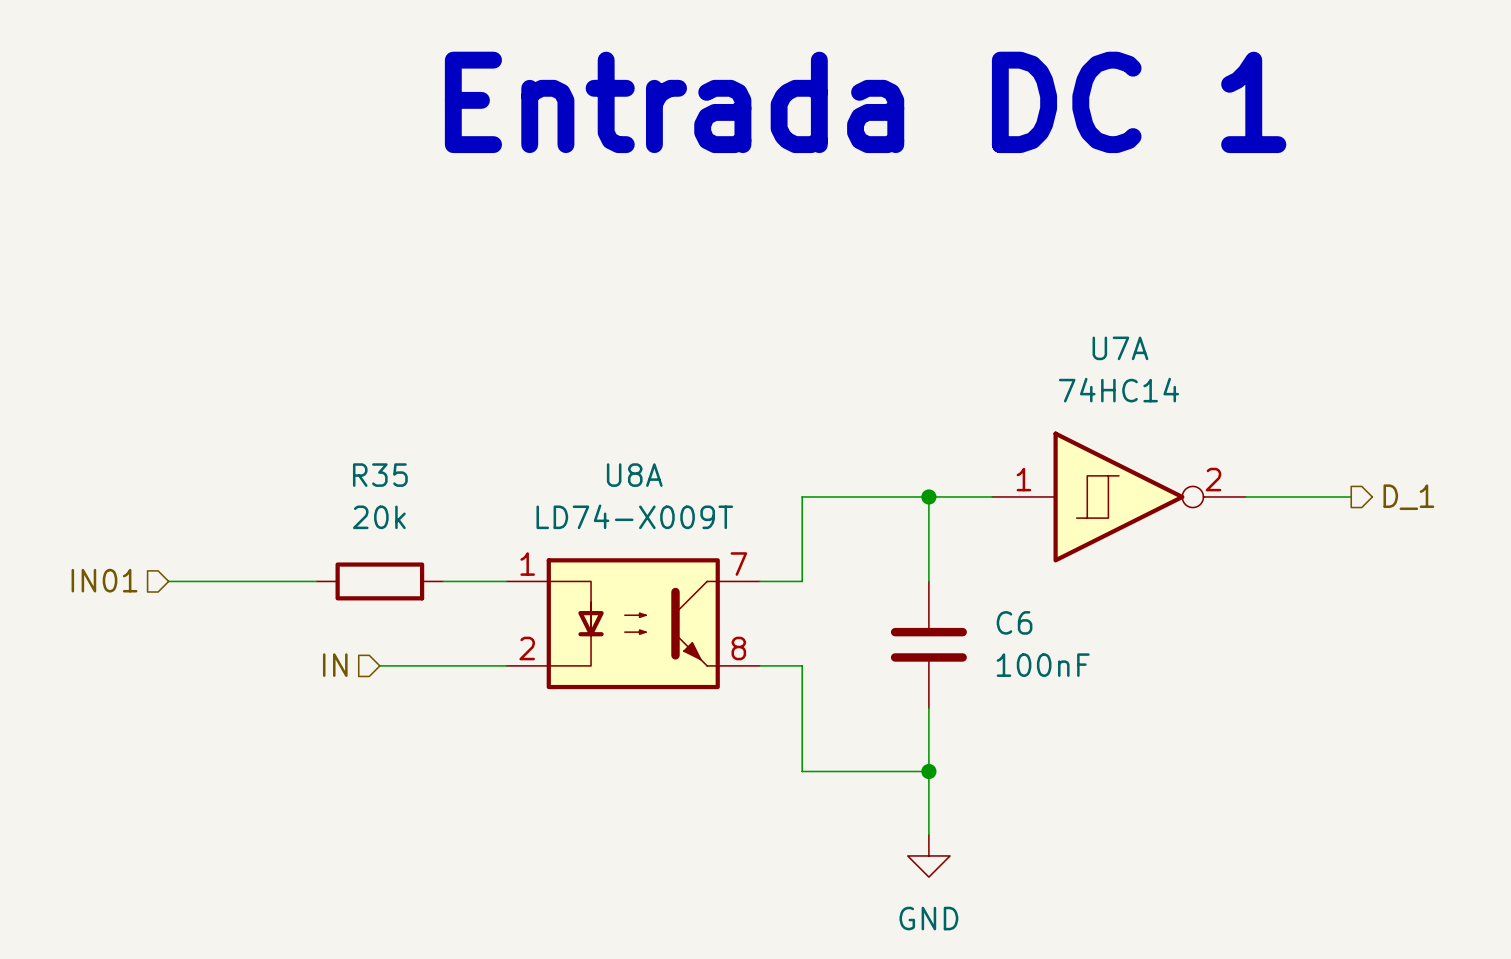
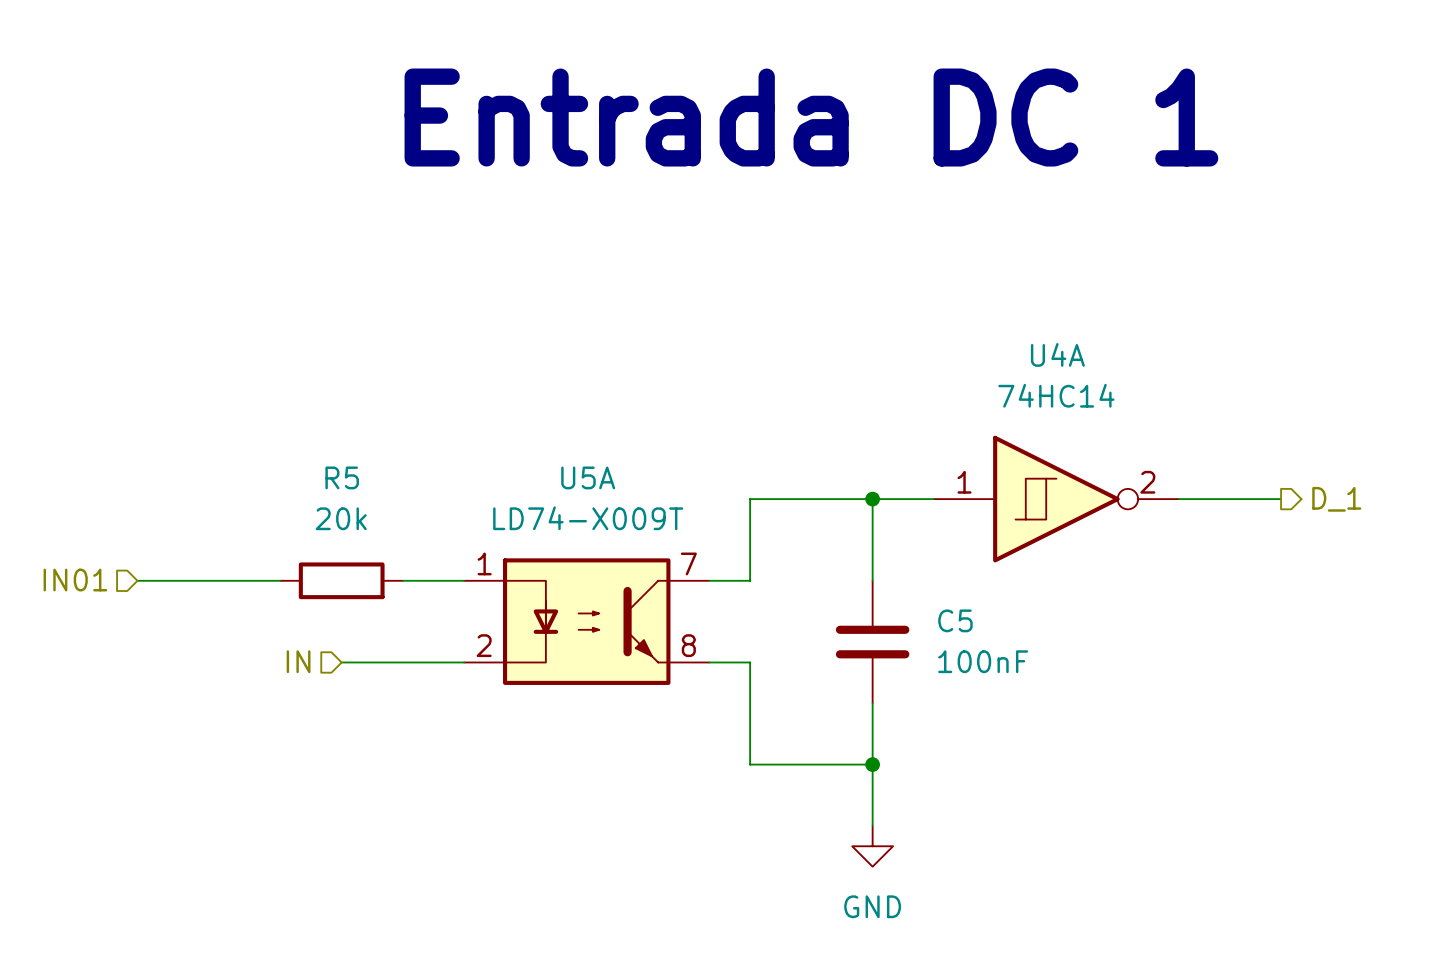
U7A name: U7A (1120, 348) -> U4A (1057, 354)
R35 name: R35 (380, 475) -> R5 (342, 477)
U8A name: U8A (634, 475) -> U5A (588, 477)
C6 name: C6 (1014, 622) -> C5 (955, 620)

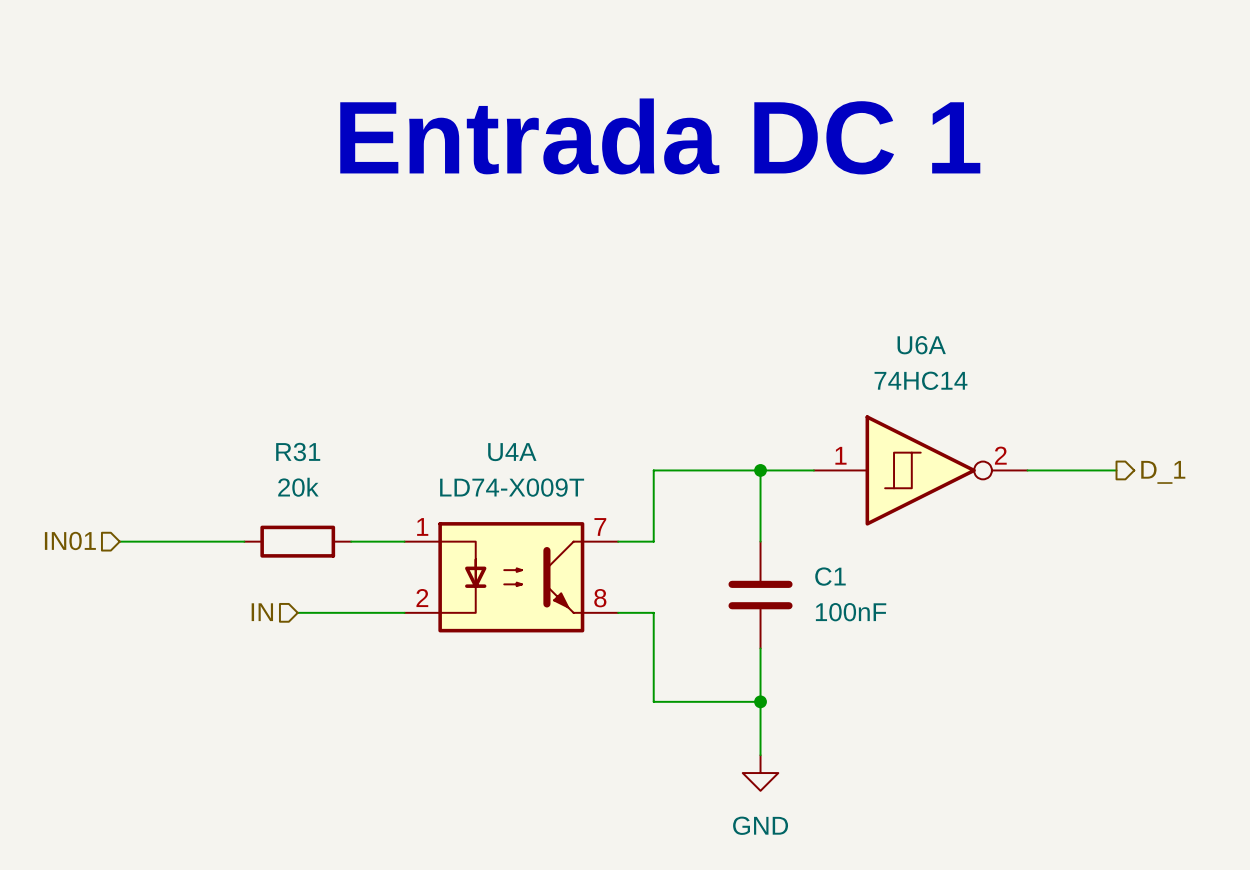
U4A name: U4A (1057, 354) -> U6A (921, 345)
R5 name: R5 (342, 477) -> R31 (298, 451)
U5A name: U5A (588, 477) -> U4A (512, 452)
C5 name: C5 (955, 620) -> C1 (830, 576)

